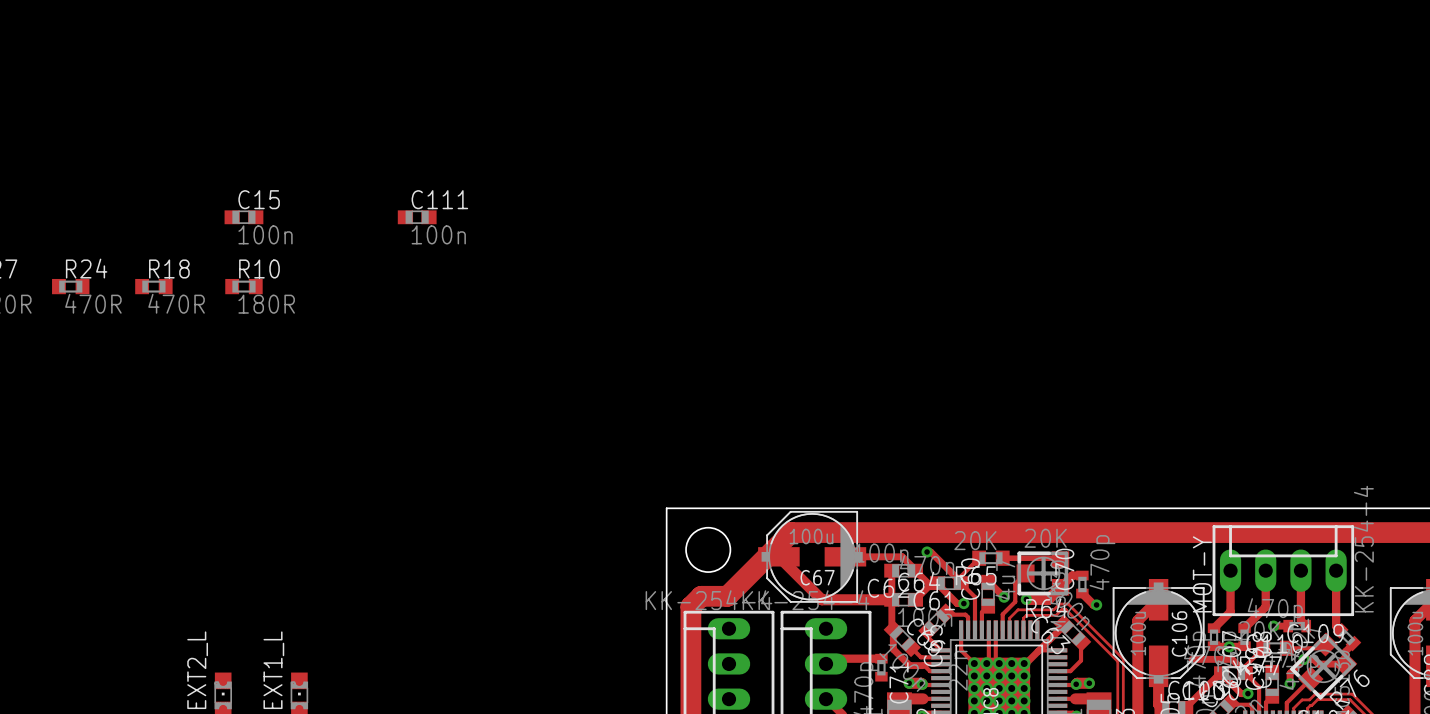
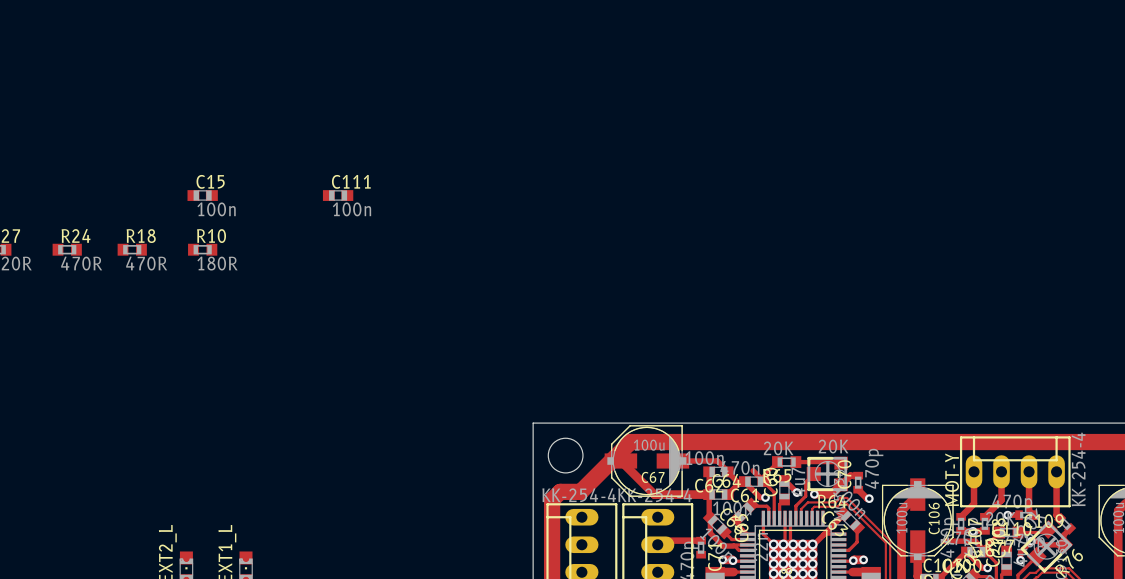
track: (927, 552) (930, 552) (948, 569) -> none
via: (927, 552) -> none

